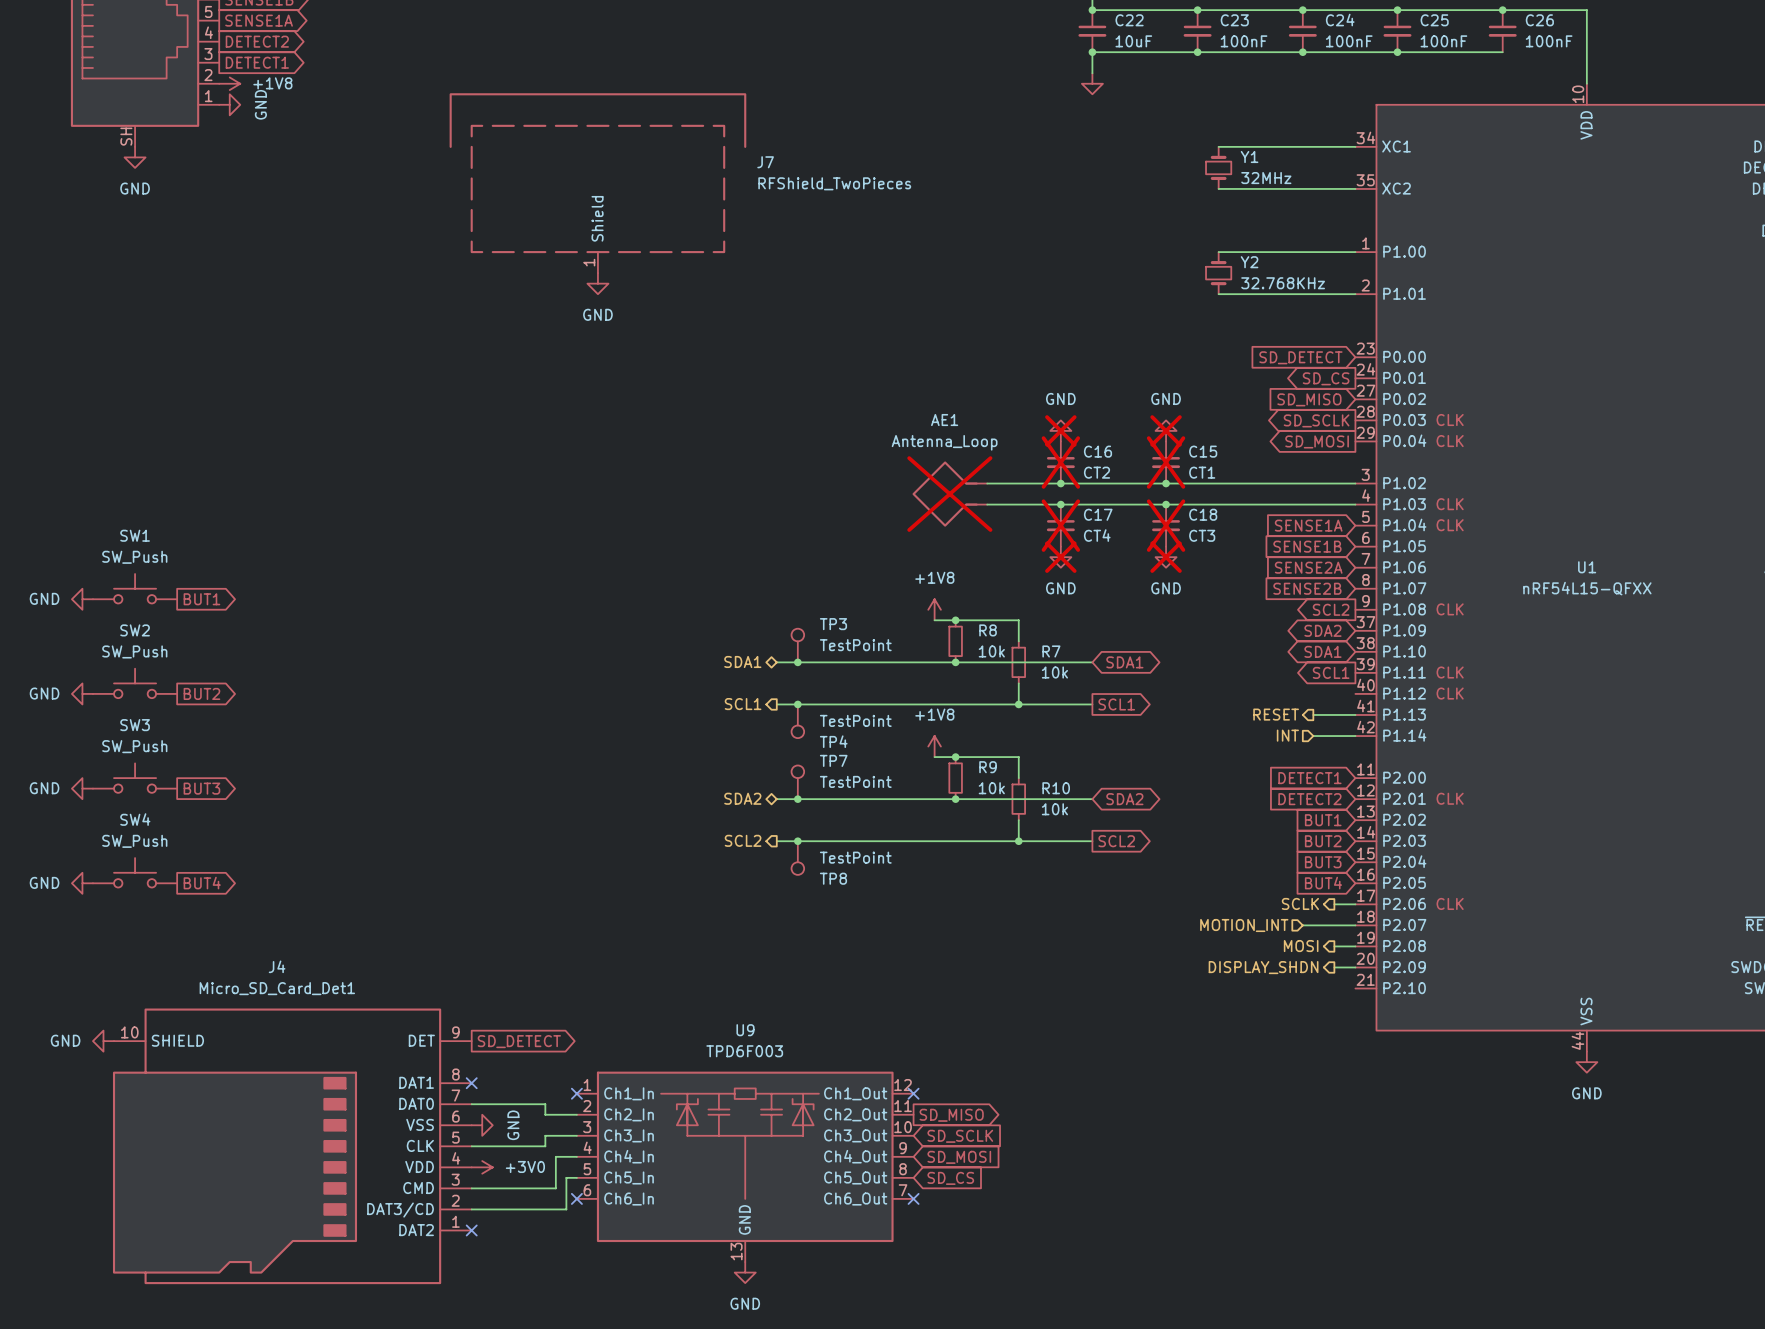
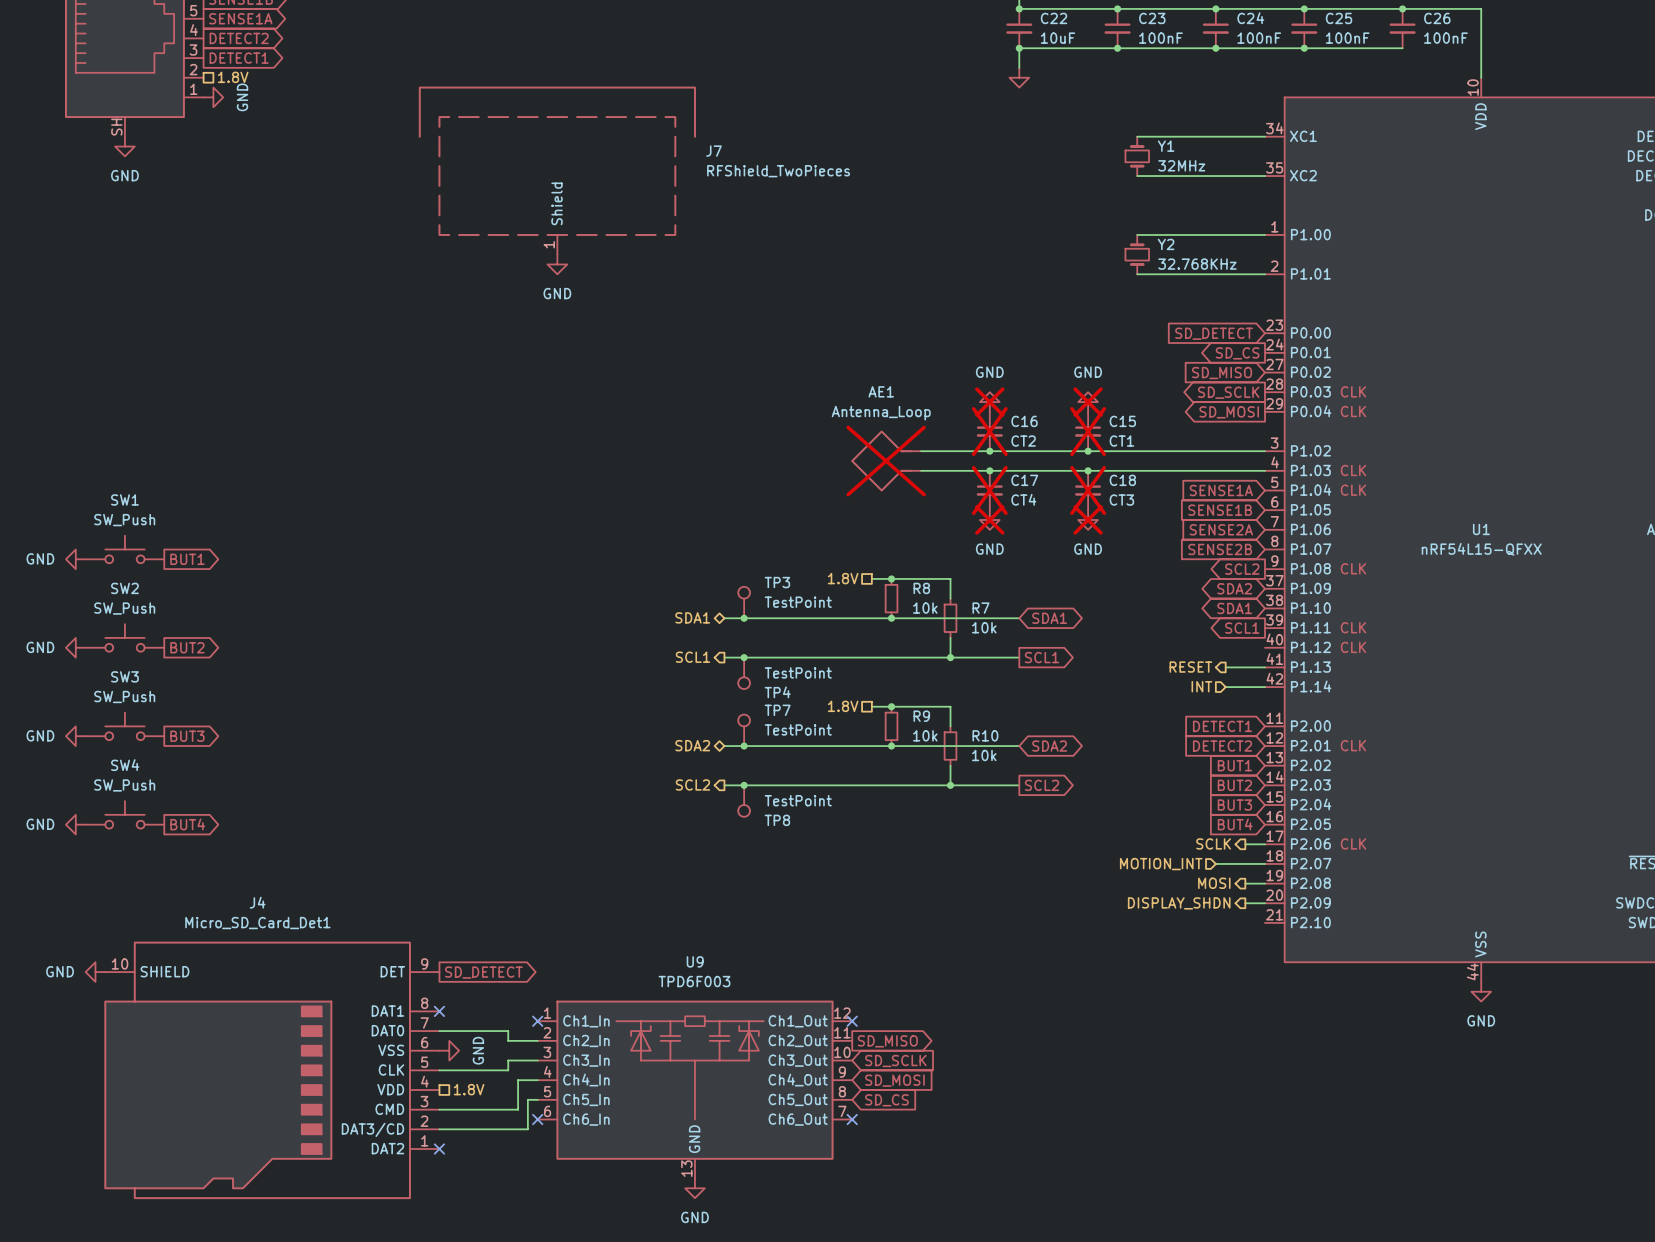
power symbol: +1V8 (229, 83) -> none
hierarchical label: none -> 1.8V (233, 77)
power symbol: +1V8 (934, 609) -> none
hierarchical label: none -> 1.8V (843, 578)
power symbol: +1V8 (934, 746) -> none
hierarchical label: none -> 1.8V (843, 706)
hierarchical label: none -> 1.8V (469, 1089)
power symbol: +3V0 (482, 1167) -> none

